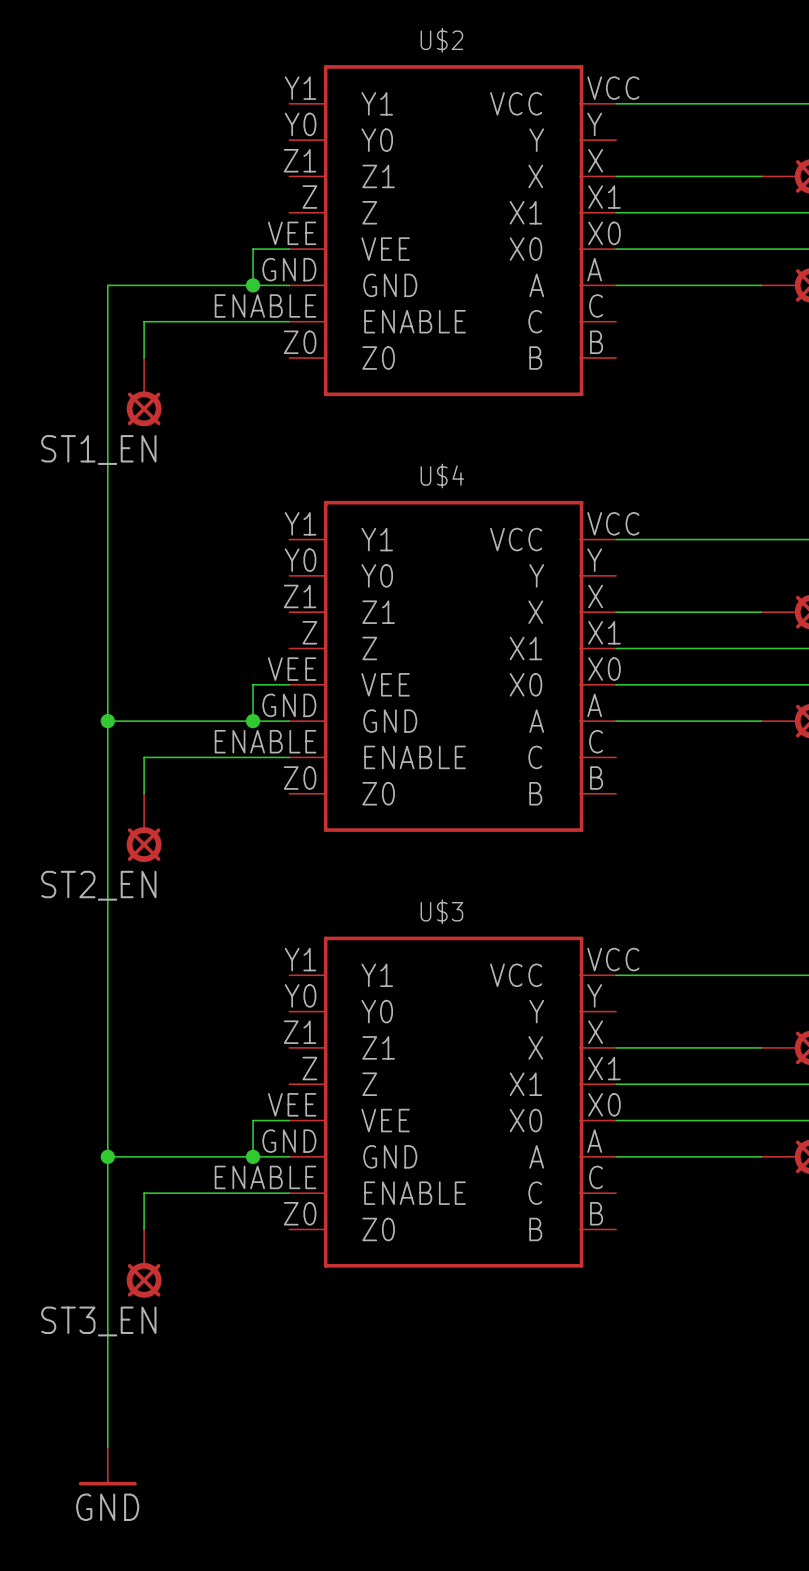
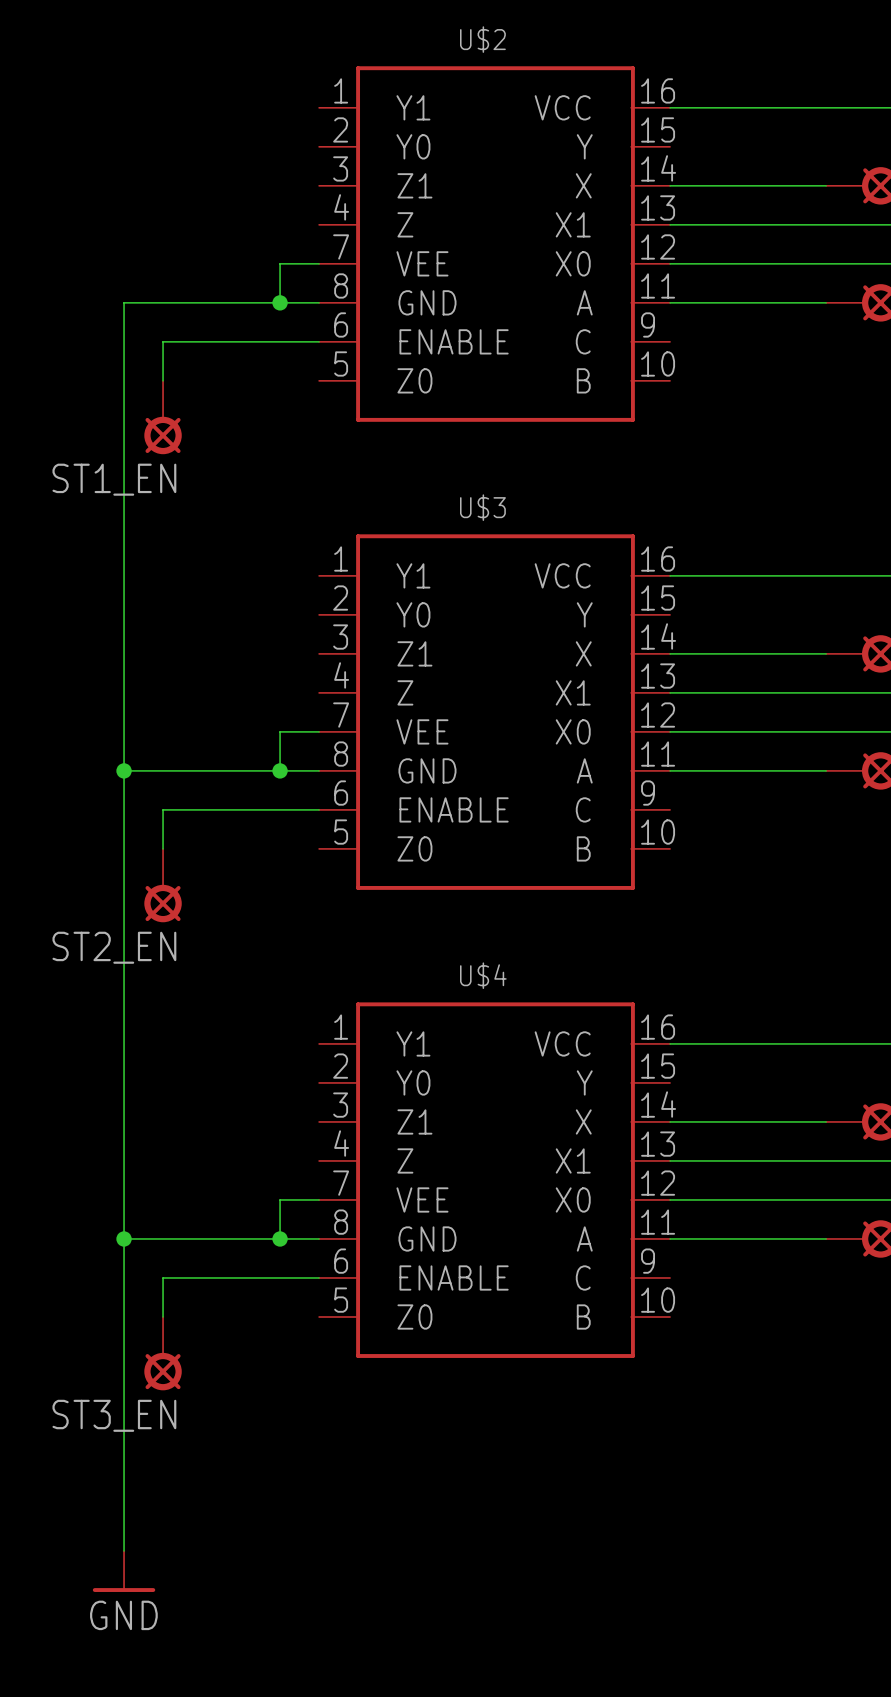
U$2 symbol: [289, 65, 617, 397] -> [319, 66, 671, 422]
U$4 symbol: [289, 500, 617, 832] -> [319, 1002, 671, 1358]
U$3 symbol: [289, 936, 617, 1268] -> [319, 534, 671, 890]

